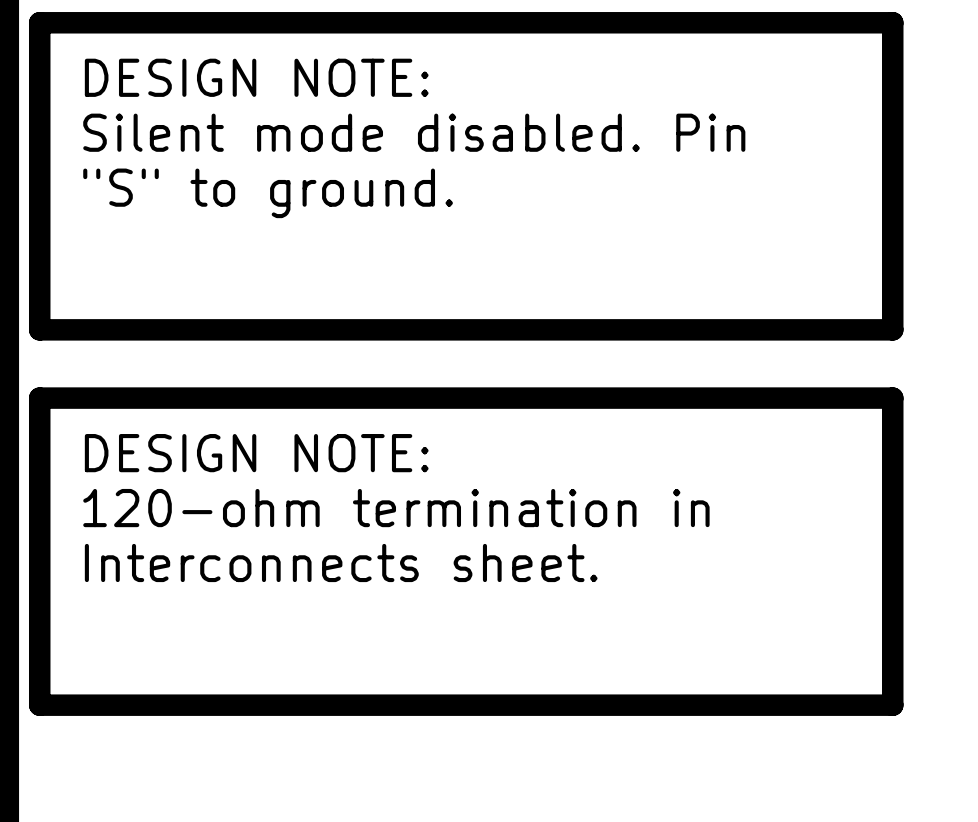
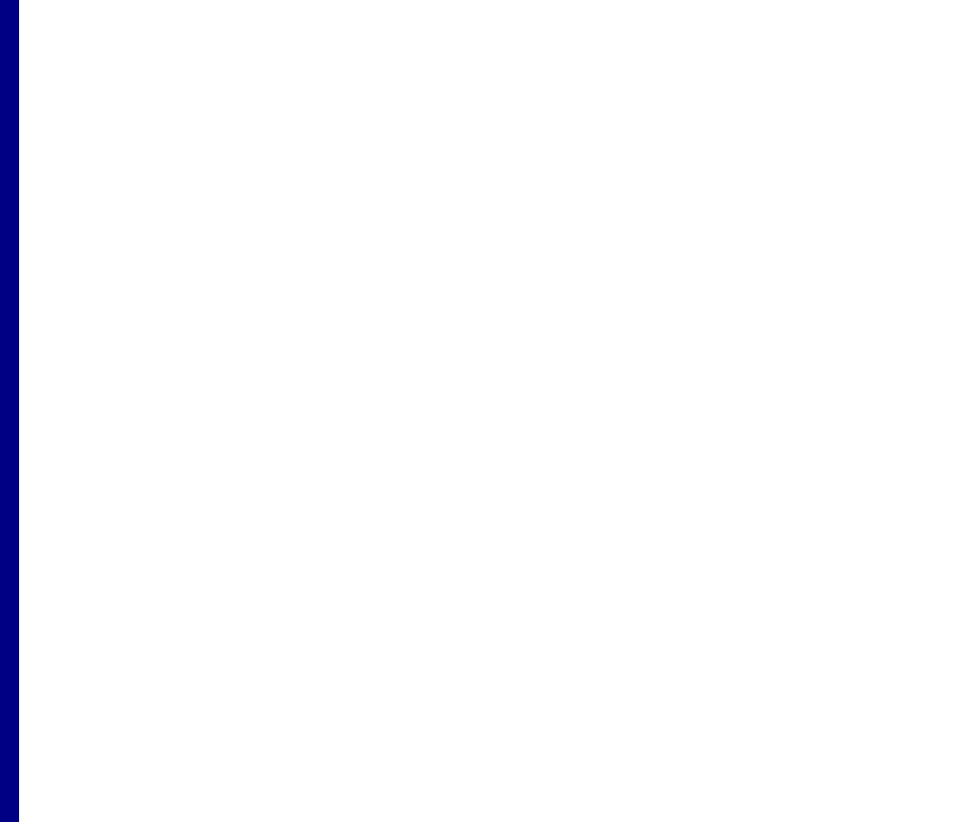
line: (39, 22) (892, 22) (892, 329) (39, 329) (39, 22) -> none
text: DESIGN NOTE: (256, 77) -> none
text: Silent mode disabled. Pin (414, 132) -> none
text: "S" to ground. (268, 193) -> none
line: (39, 398) (39, 705) (892, 705) (892, 398) (39, 398) -> none
text: DESIGN NOTE: (256, 453) -> none
text: 120-ohm termination in (396, 508) -> none
text: Interconnects sheet. (341, 562) -> none

